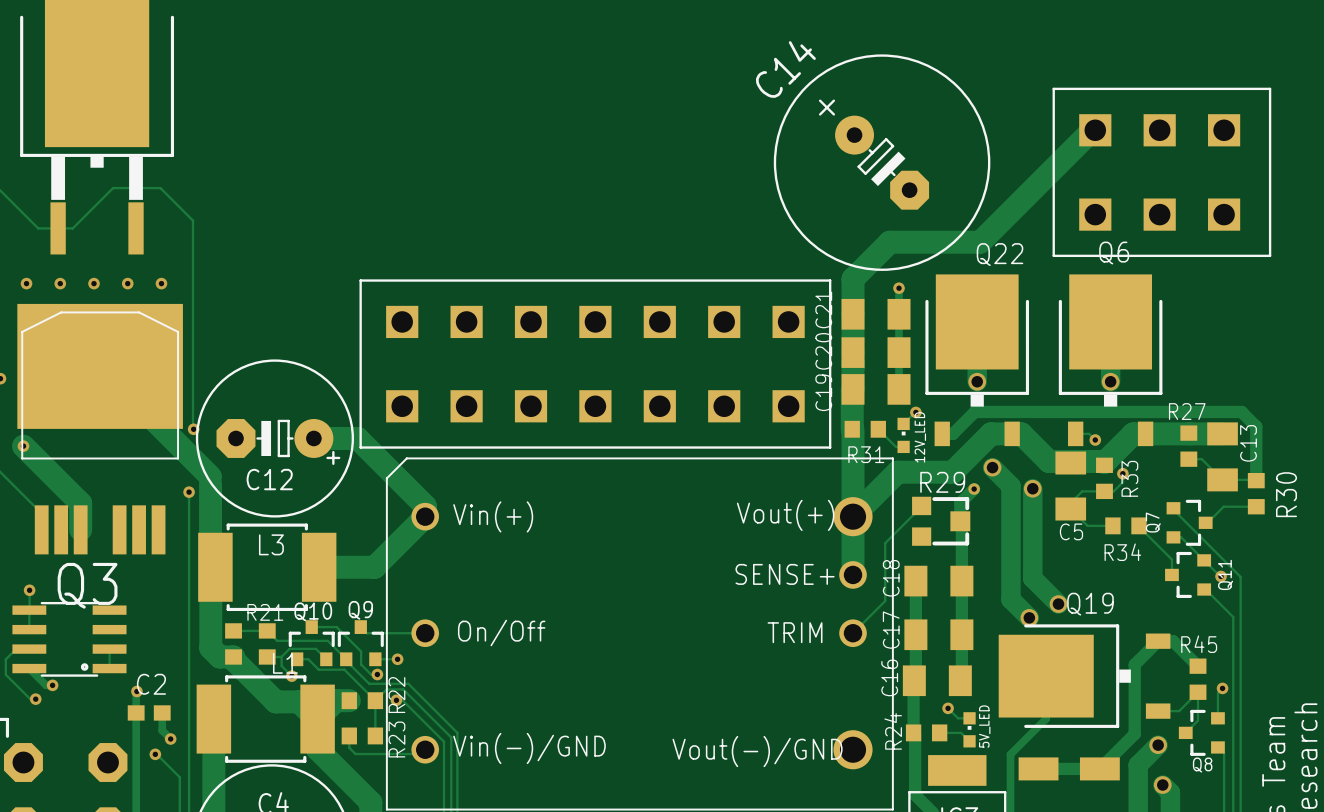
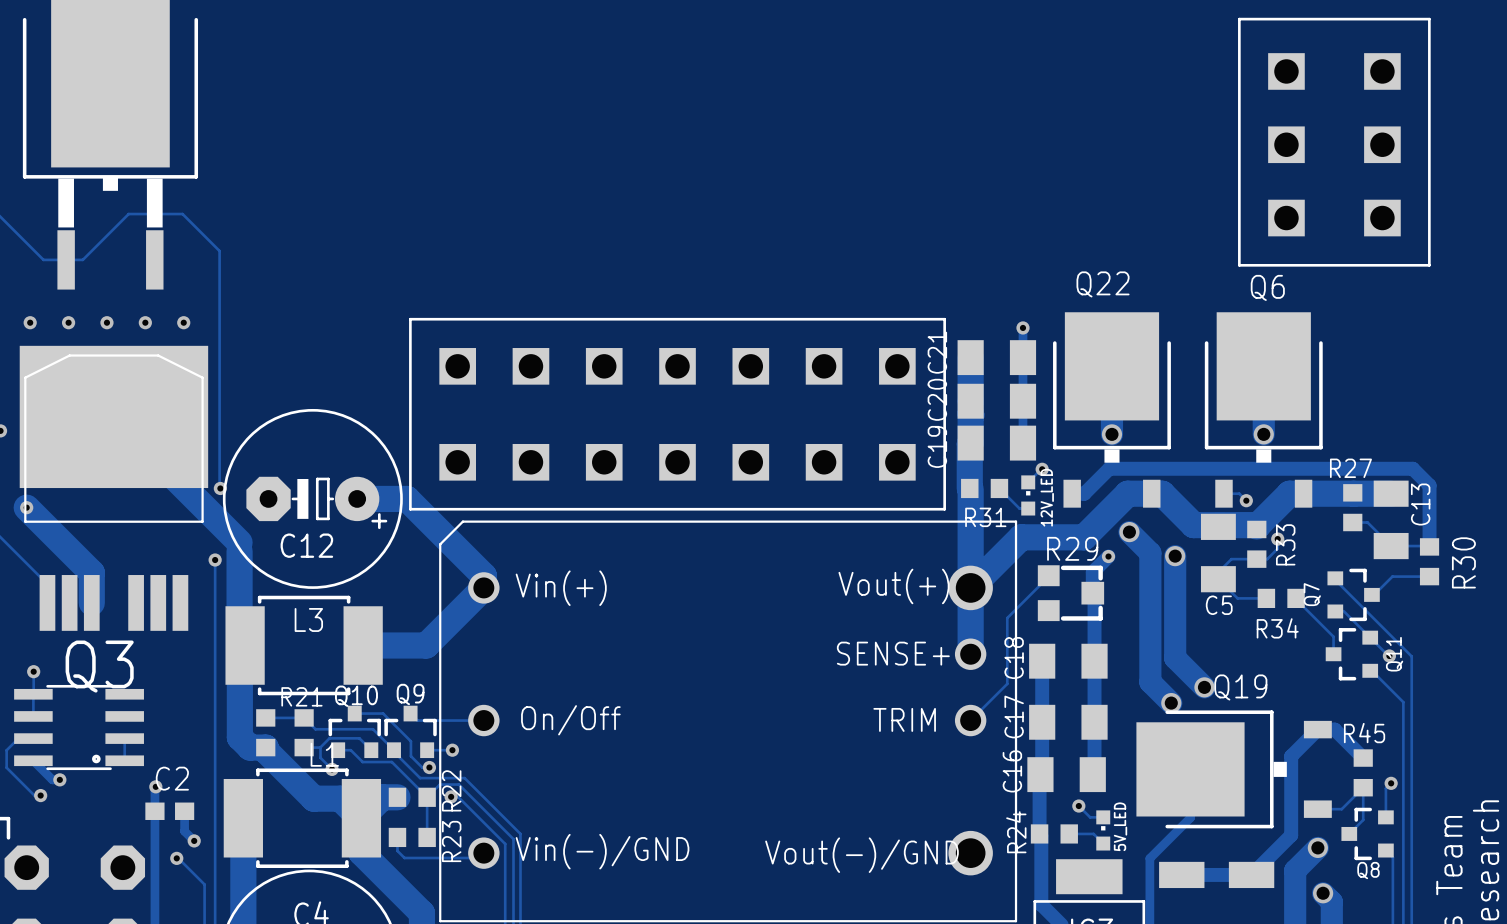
track: (1095, 130) (1092, 130) (980, 242) (889, 242) (853, 279) (853, 314) -> none
C14: (882, 162) -> none
part rotation: 0° (1161, 172) -> 90° counterclockwise (1334, 142)
Q22 name position: Q22 (1000, 254) -> Q22 (1103, 284)

